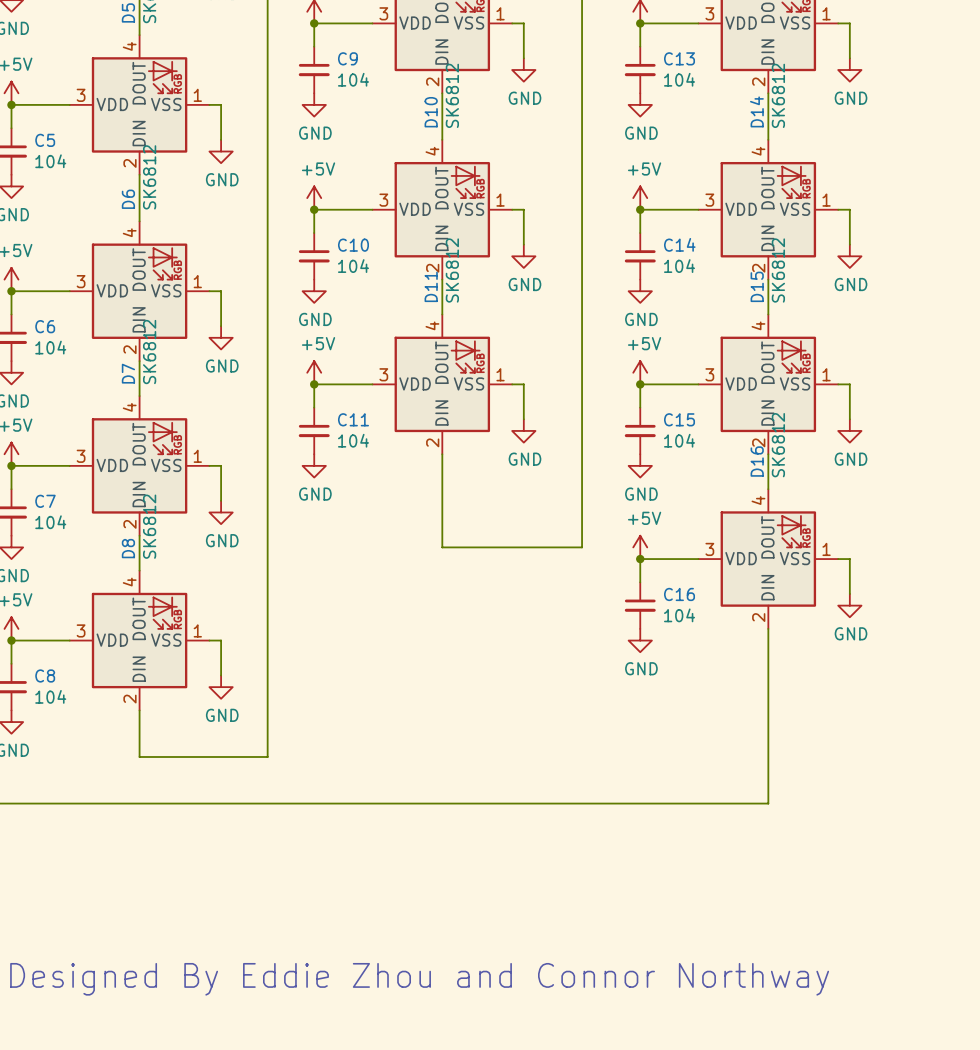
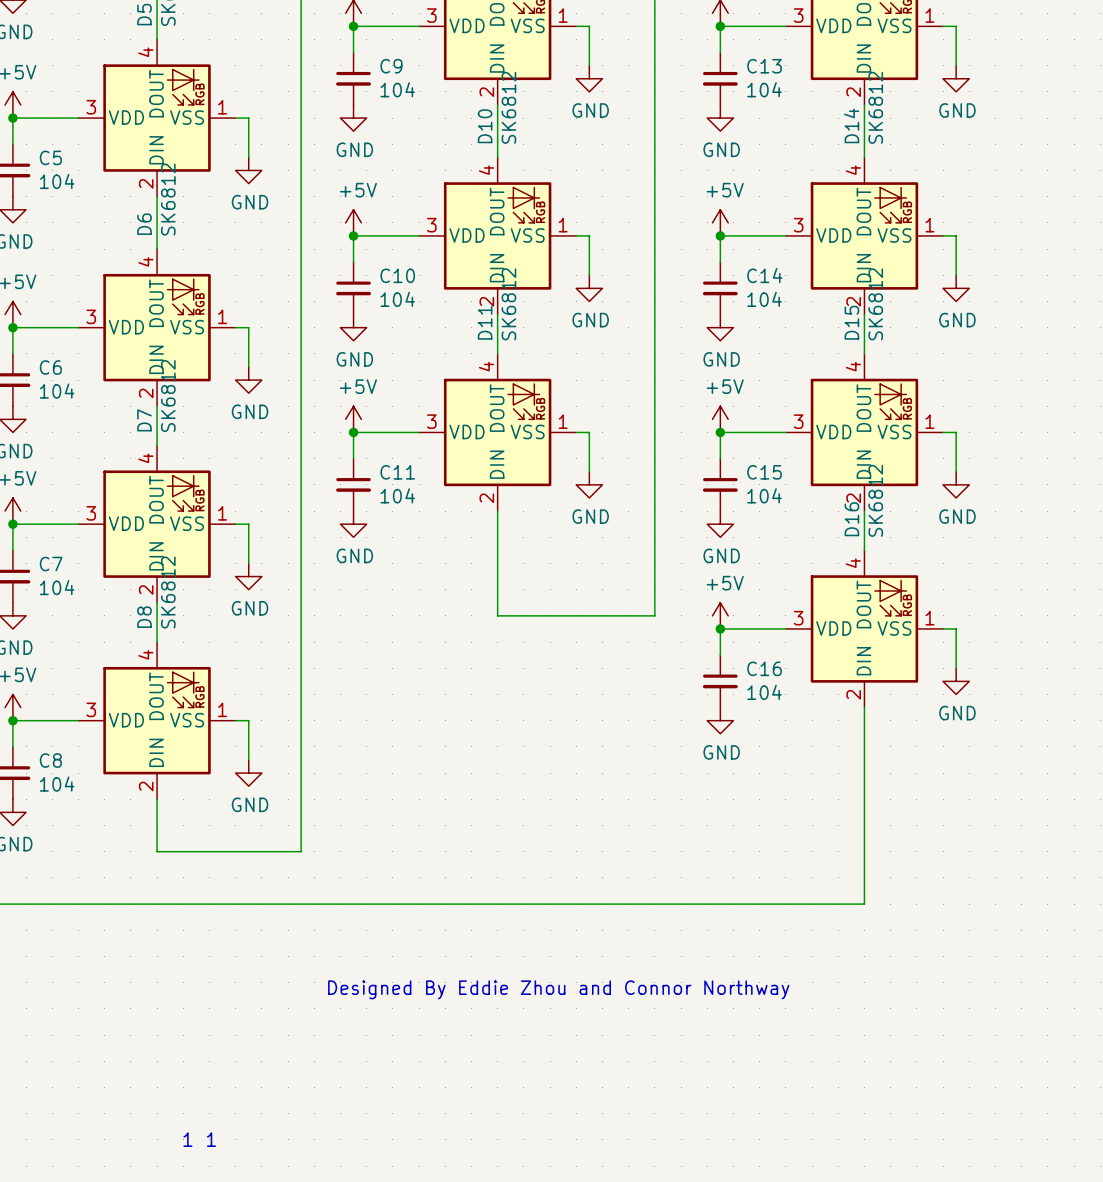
text: none -> Designed By Eddie Zhou and Connor Northway (558, 989)
text: Designed By Eddie Zhou and Connor Northway (419, 979) -> none
text: none -> 1 (187, 1139)
text: none -> 1 (211, 1139)

